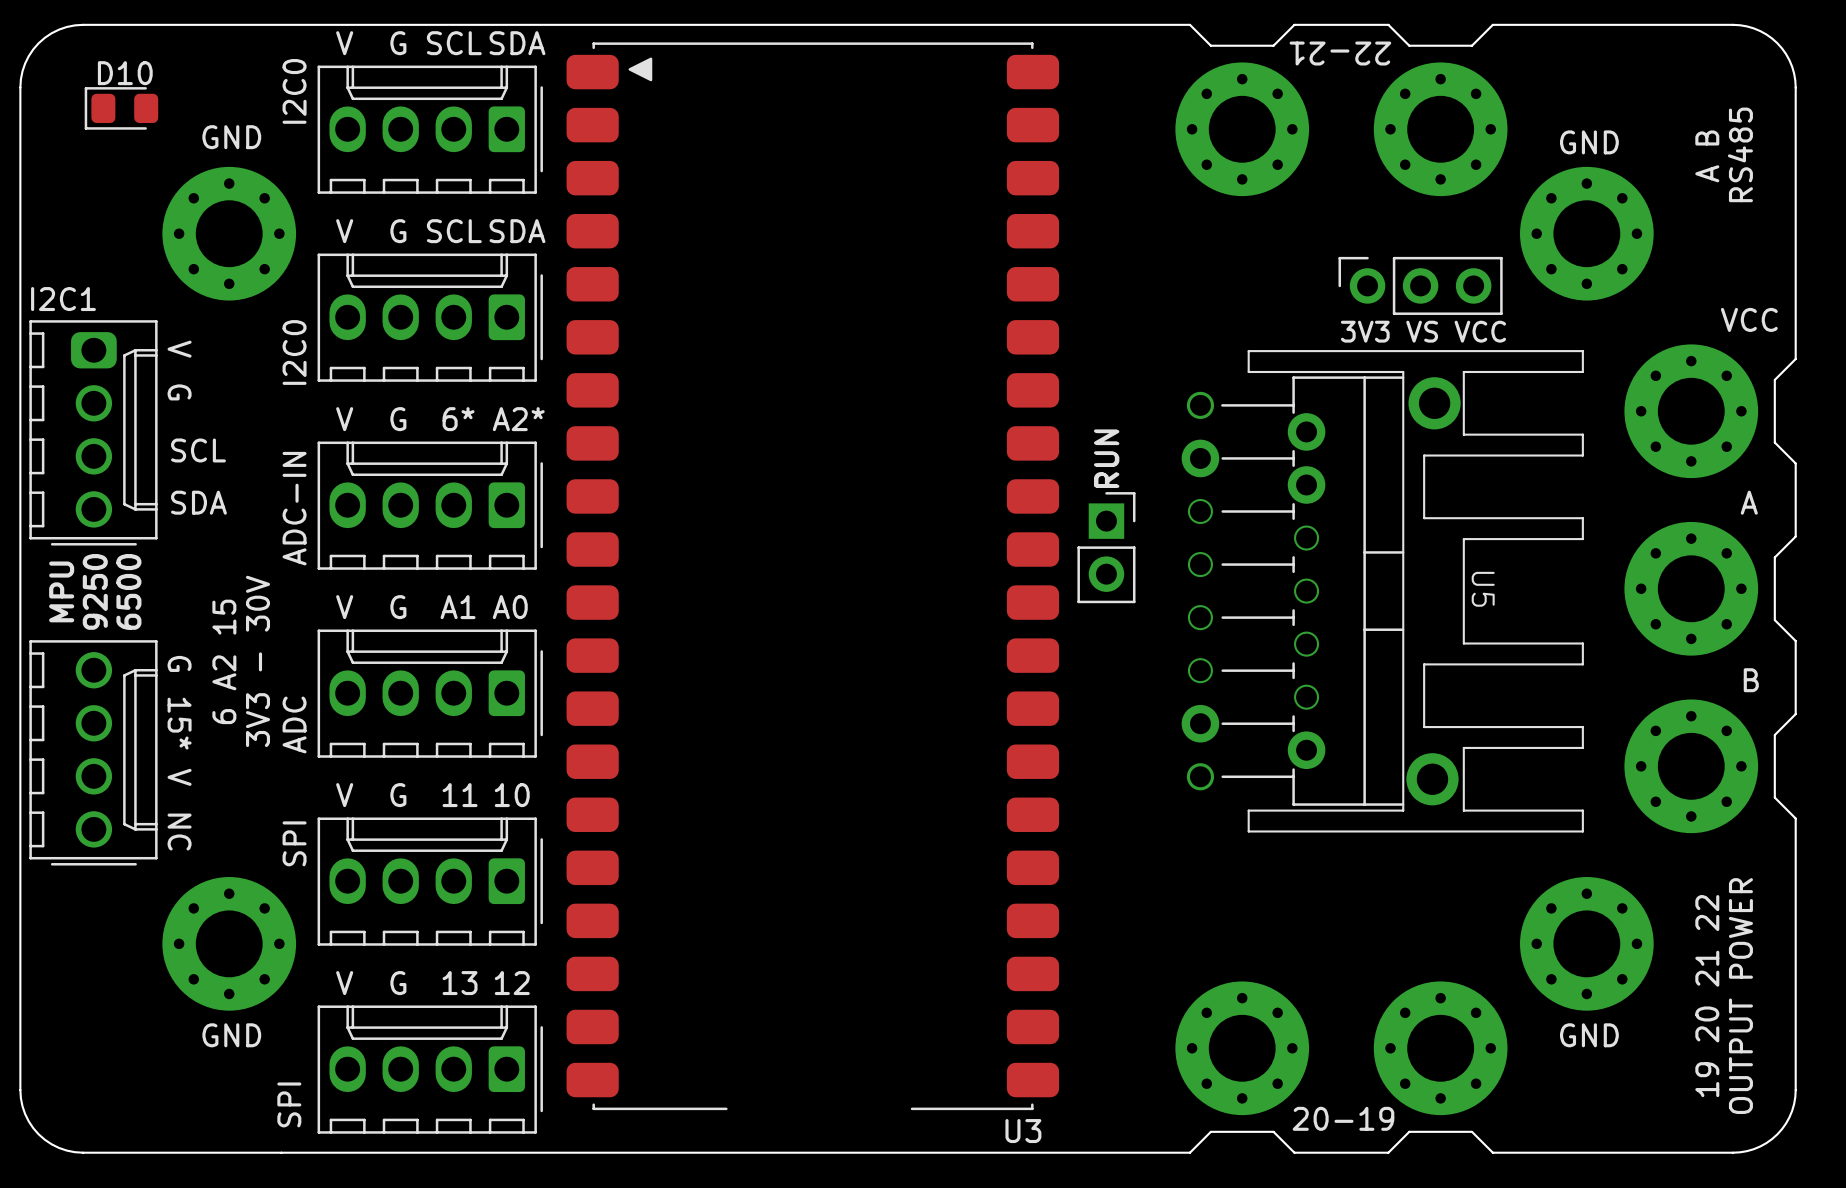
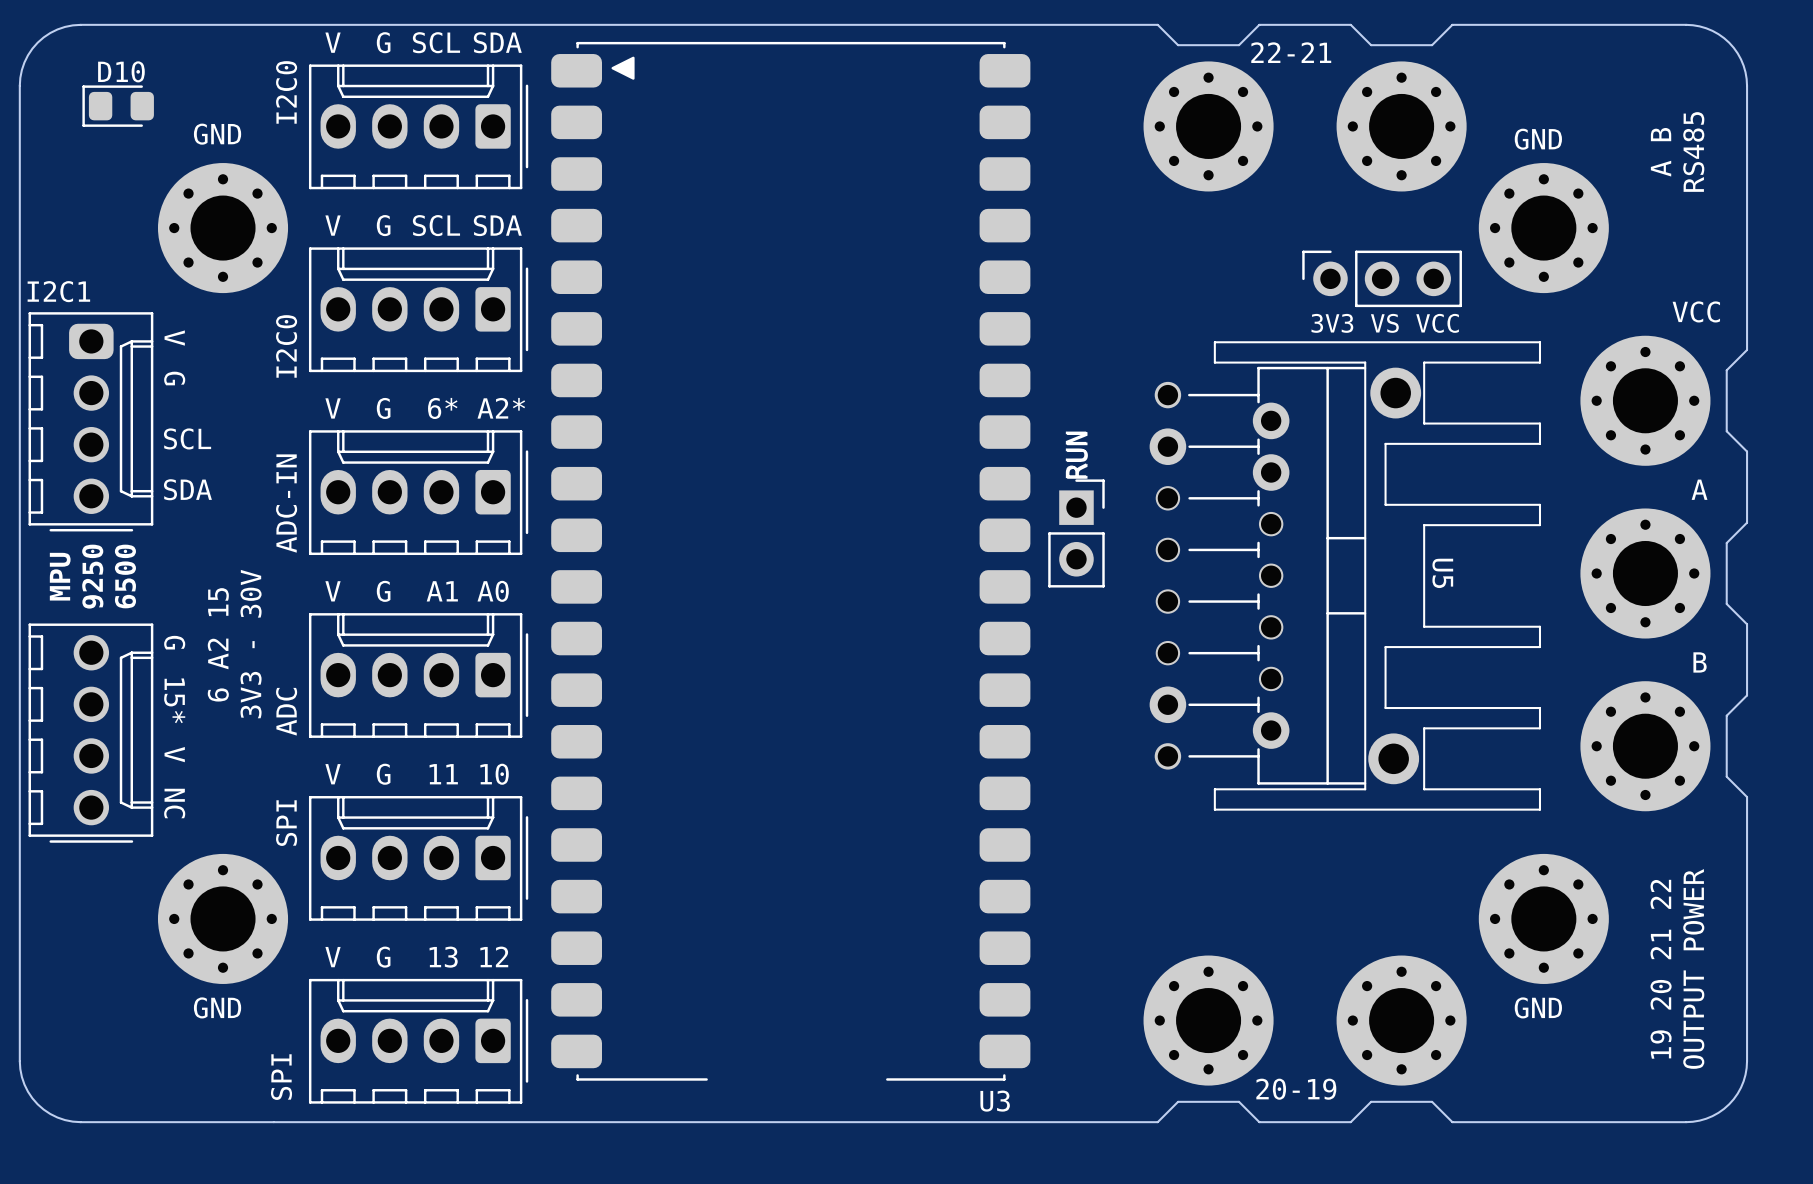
text rotation: 0° (1340, 53) -> 180° (1291, 52)

